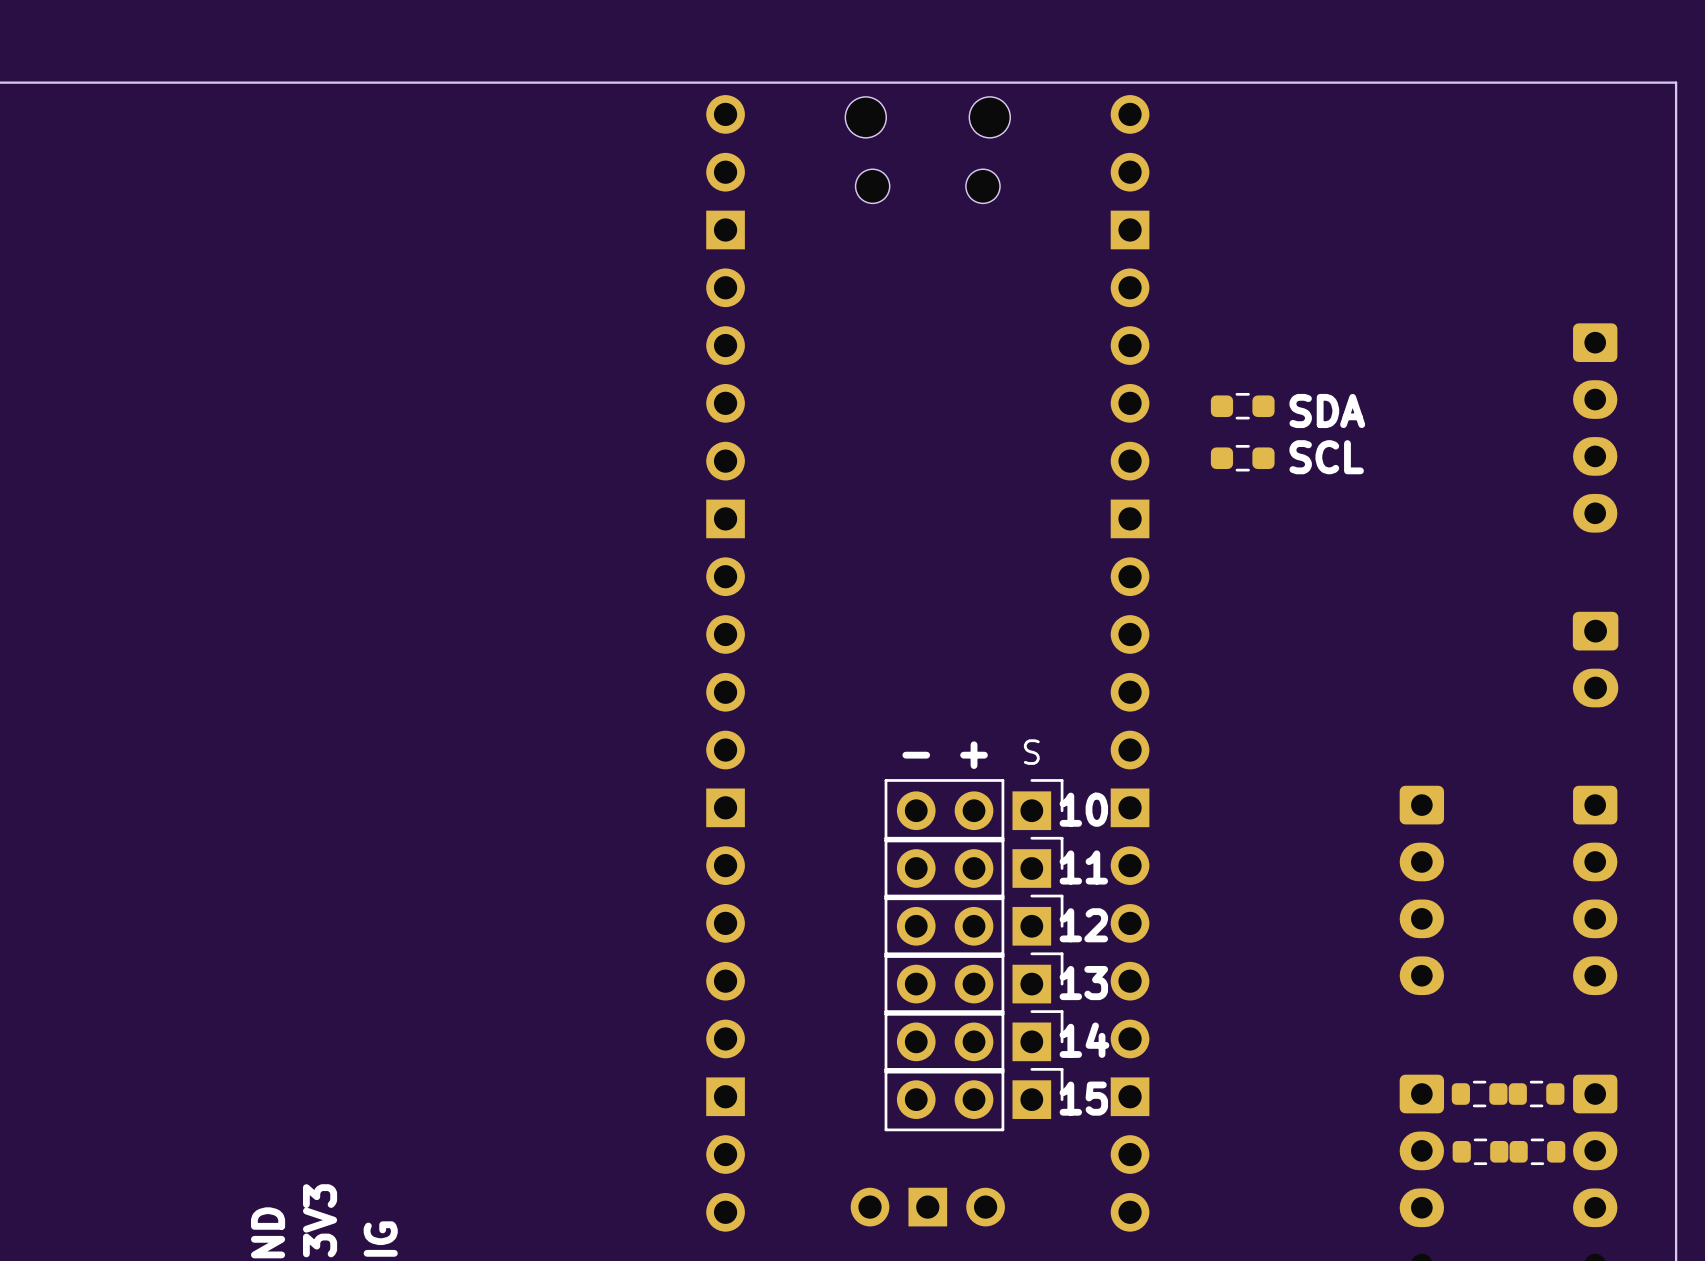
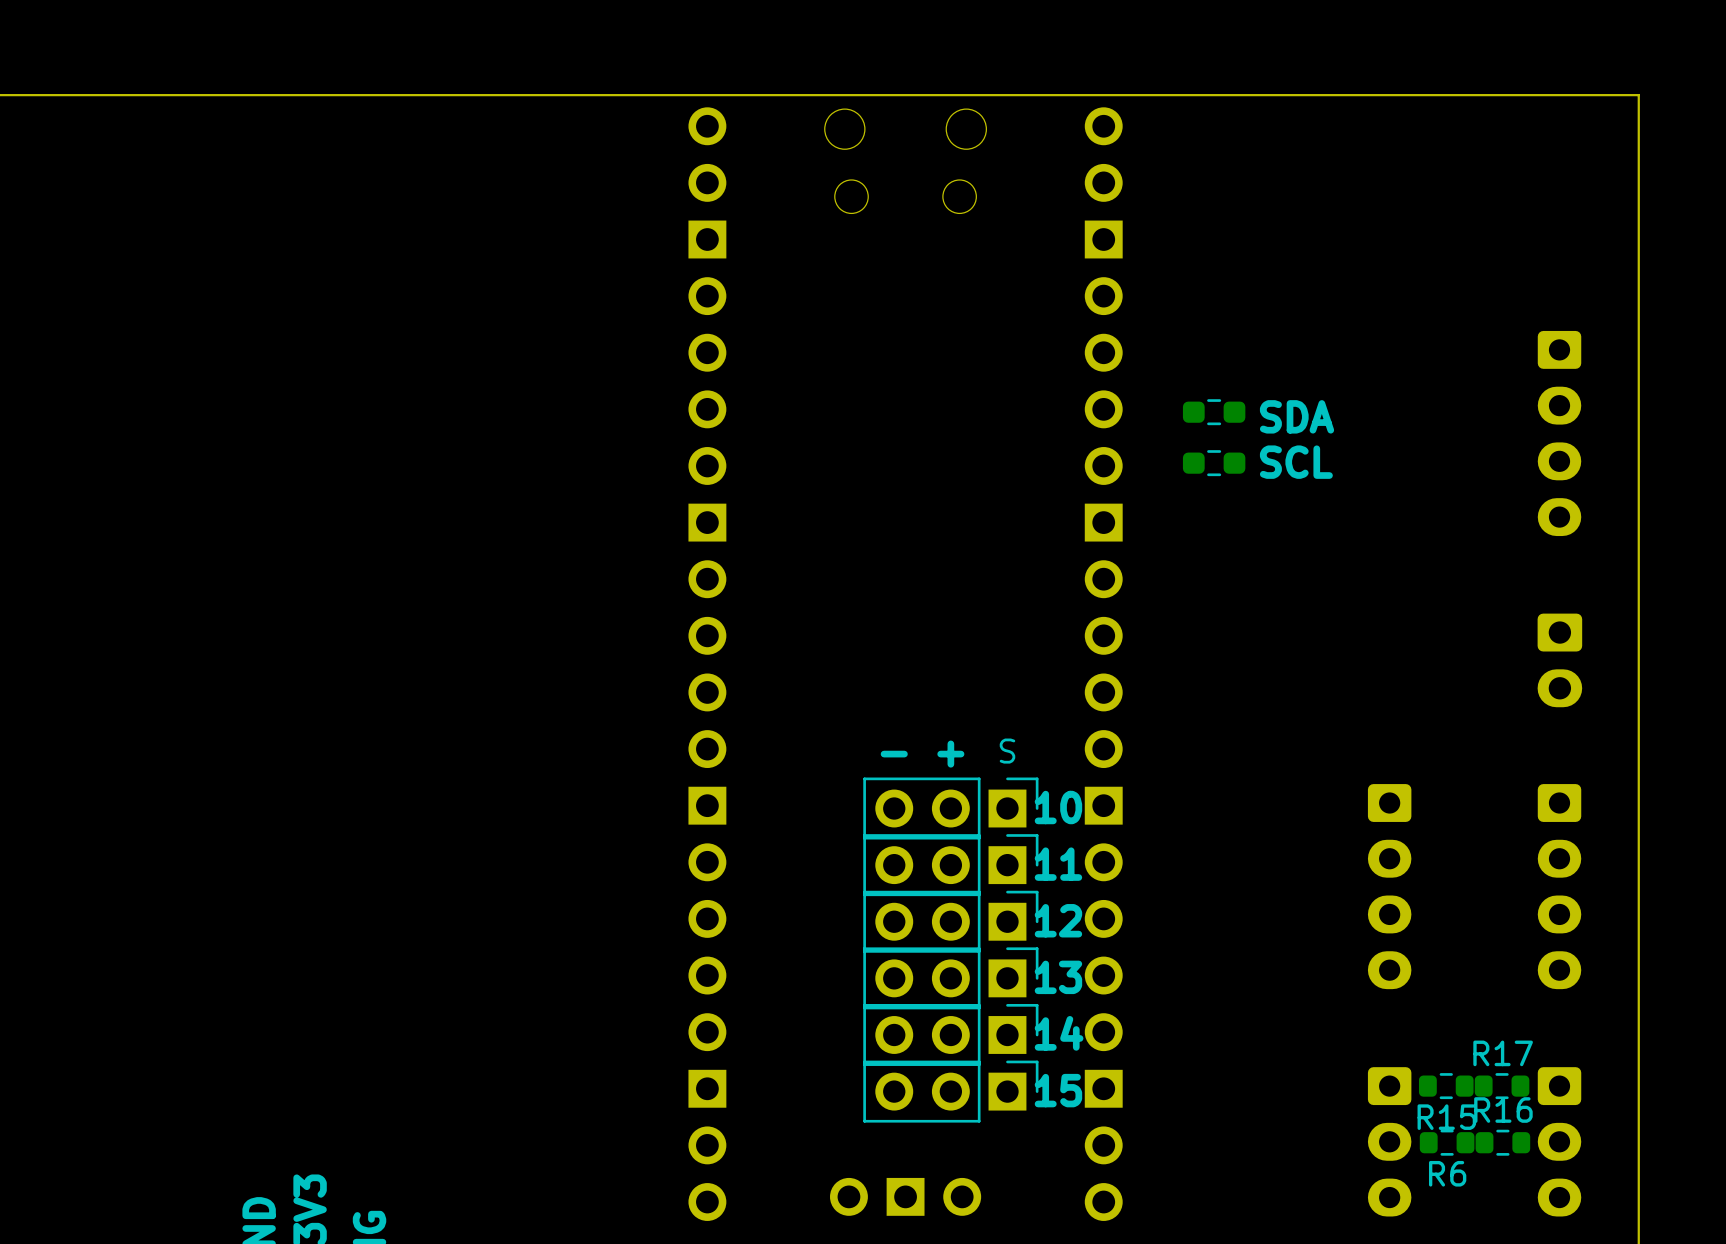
R17 name: none -> R17 (1503, 1053)
R16 name: none -> R16 (1503, 1110)
R15 name: none -> R15 (1446, 1117)
R6 name: none -> R6 (1447, 1173)

